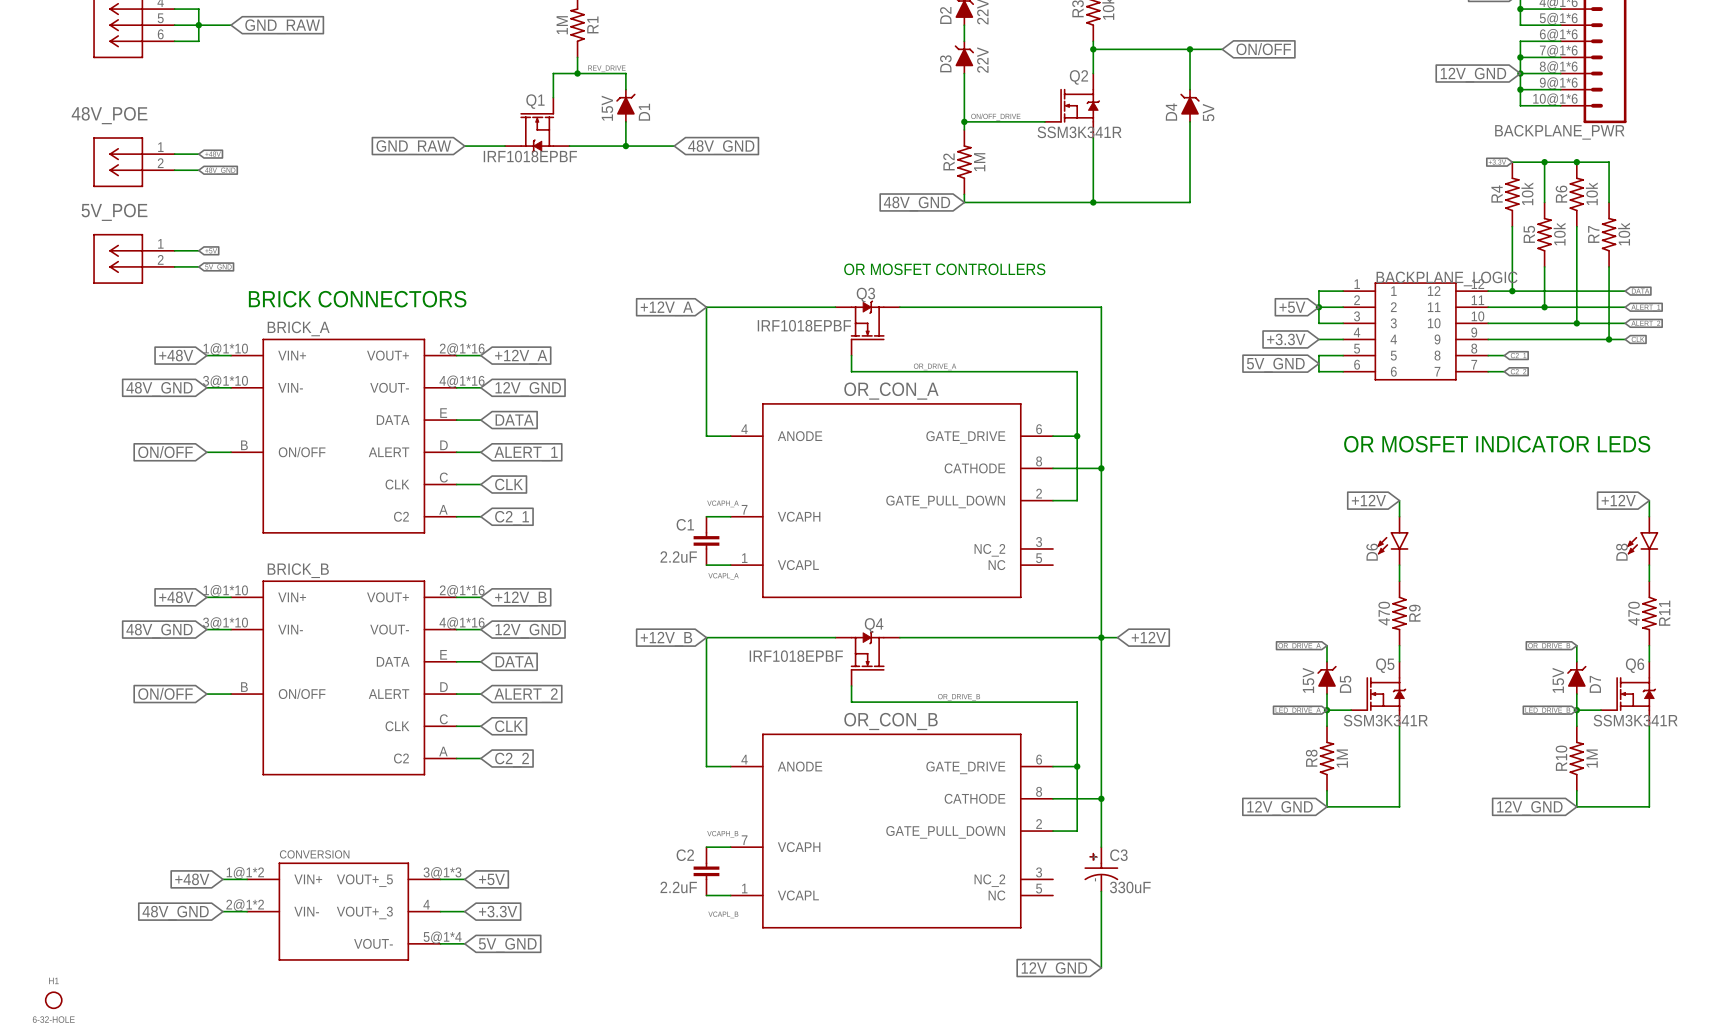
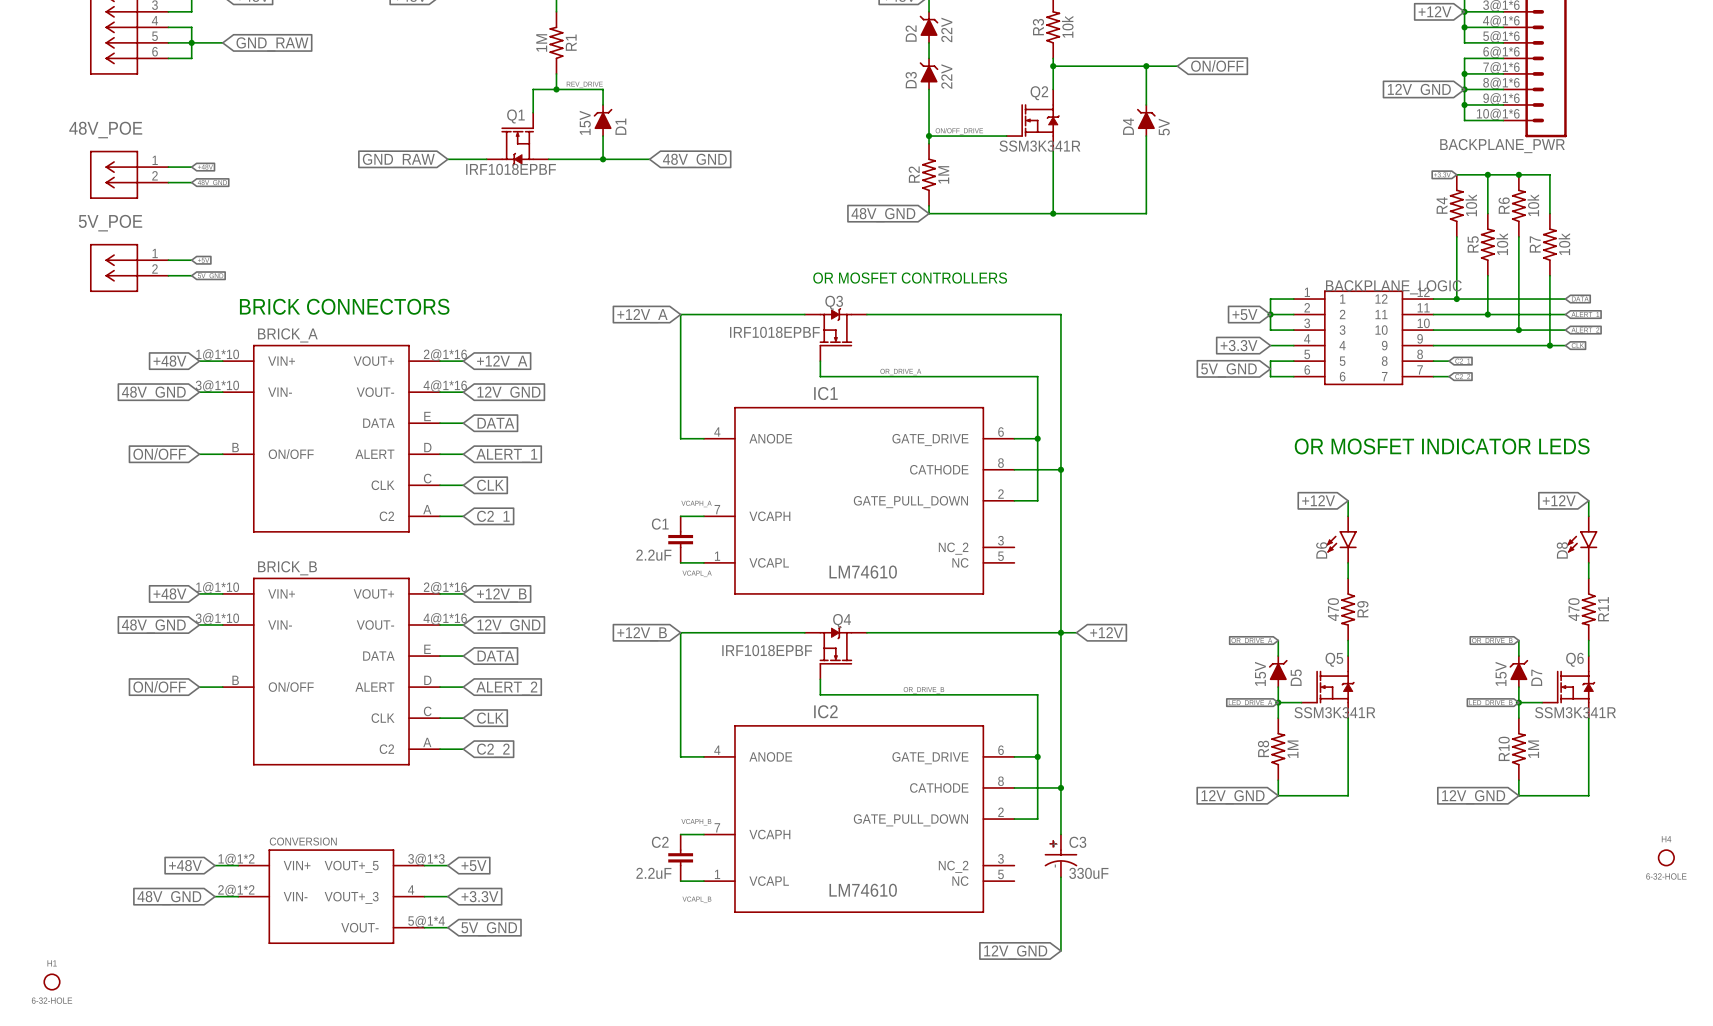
OR_CON_A name: OR_CON_A (891, 391) -> IC1 (825, 393)
OR_CON_A value: none -> LM74610 (863, 572)
OR_CON_B name: OR_CON_B (890, 721) -> IC2 (825, 711)
OR_CON_B value: none -> LM74610 (863, 890)

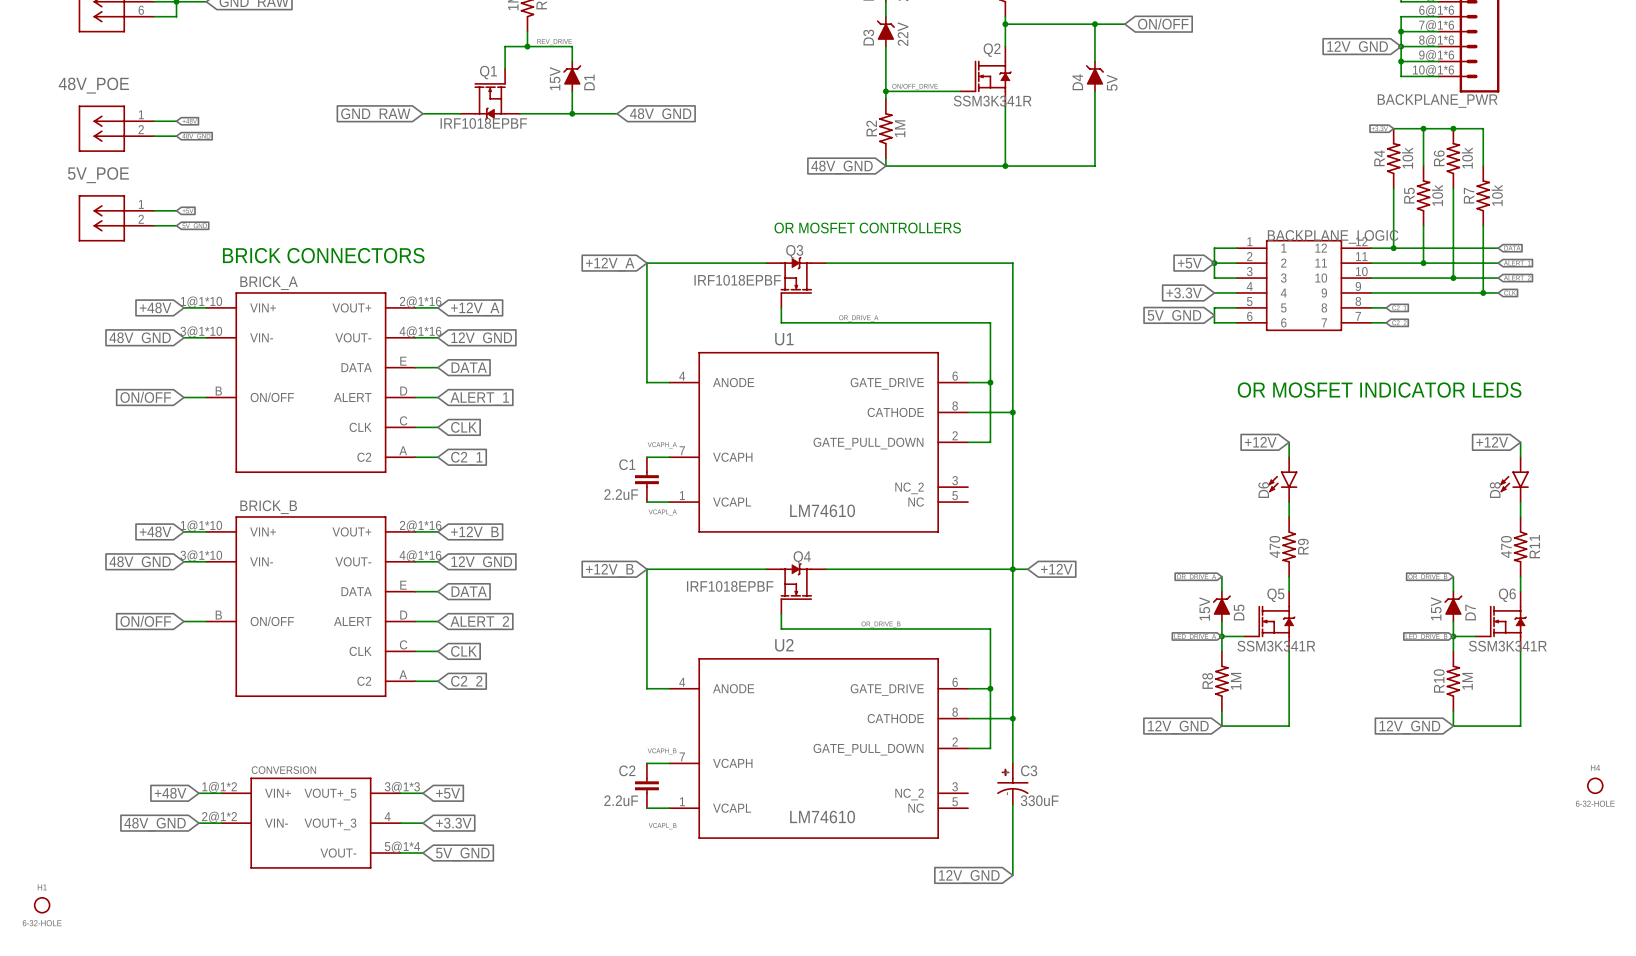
IC1 name: IC1 (825, 393) -> U1 (784, 339)
IC2 name: IC2 (825, 711) -> U2 (784, 645)

